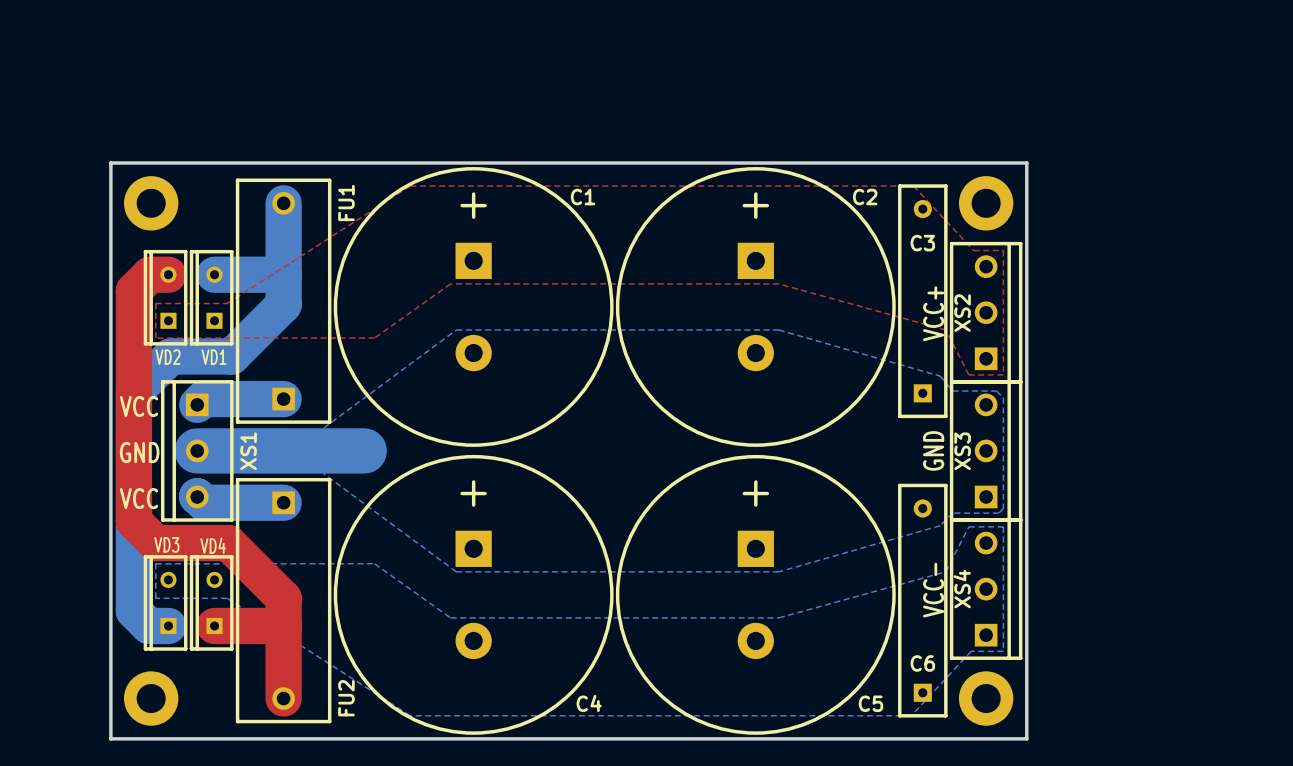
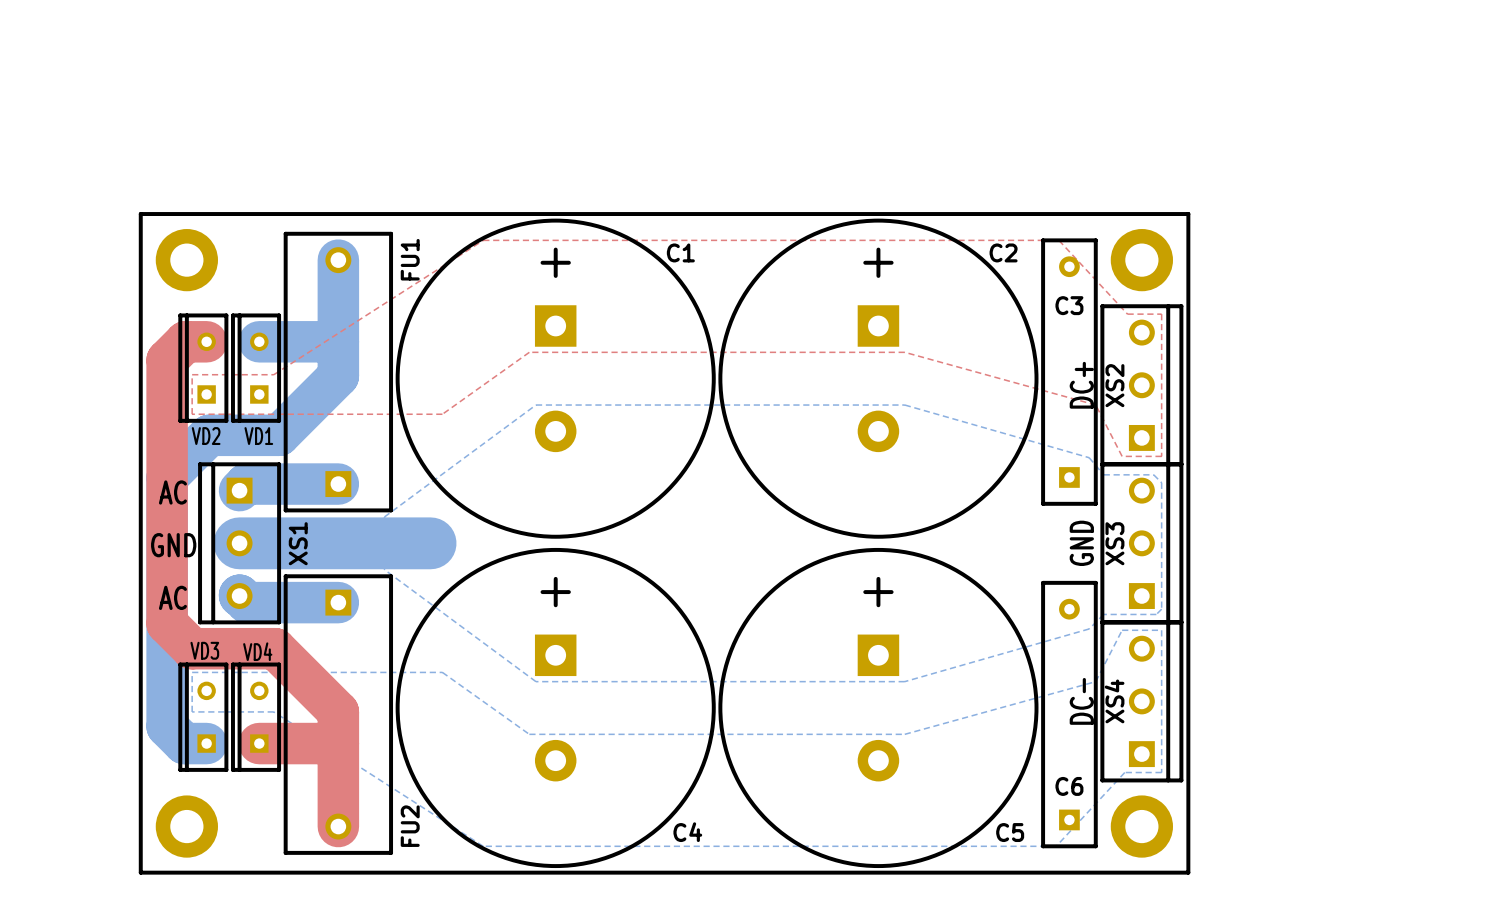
text: VCC+ (933, 313) -> DC+ (1081, 385)
text: VCC (139, 406) -> AC (172, 492)
text: VCC (139, 498) -> AC (172, 597)
text: VCC- (933, 590) -> DC- (1081, 701)

